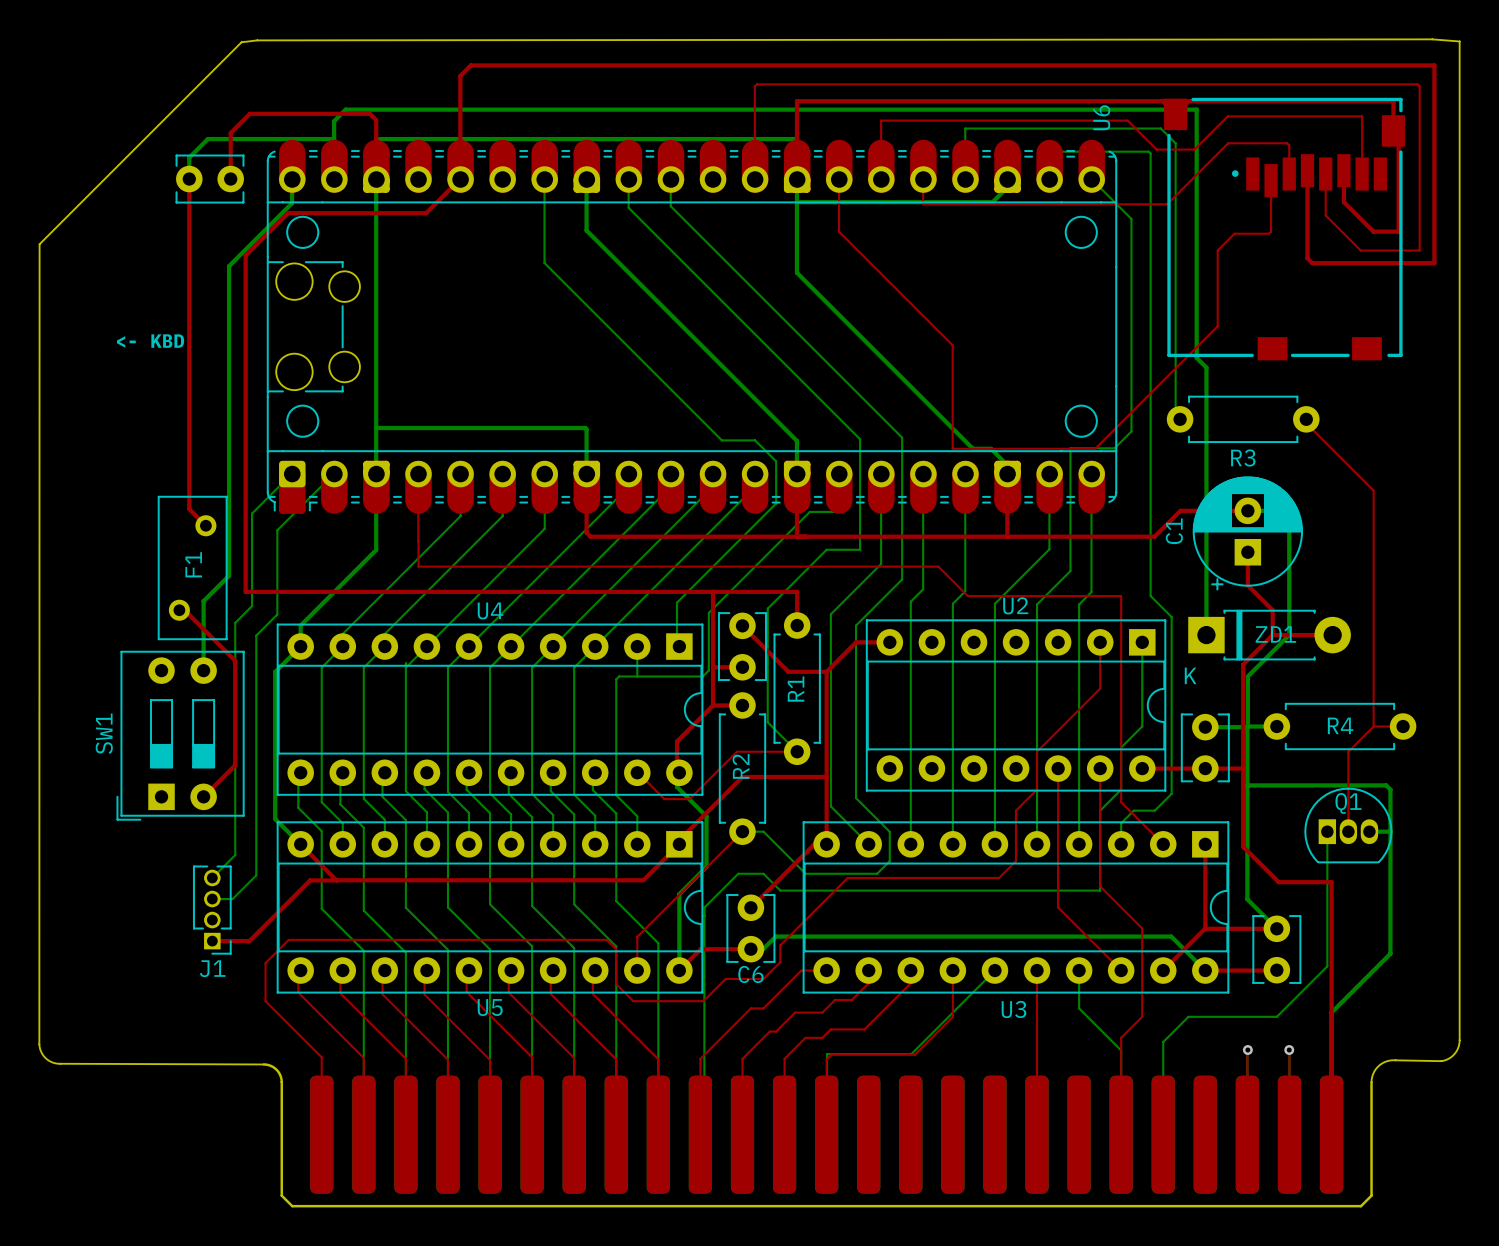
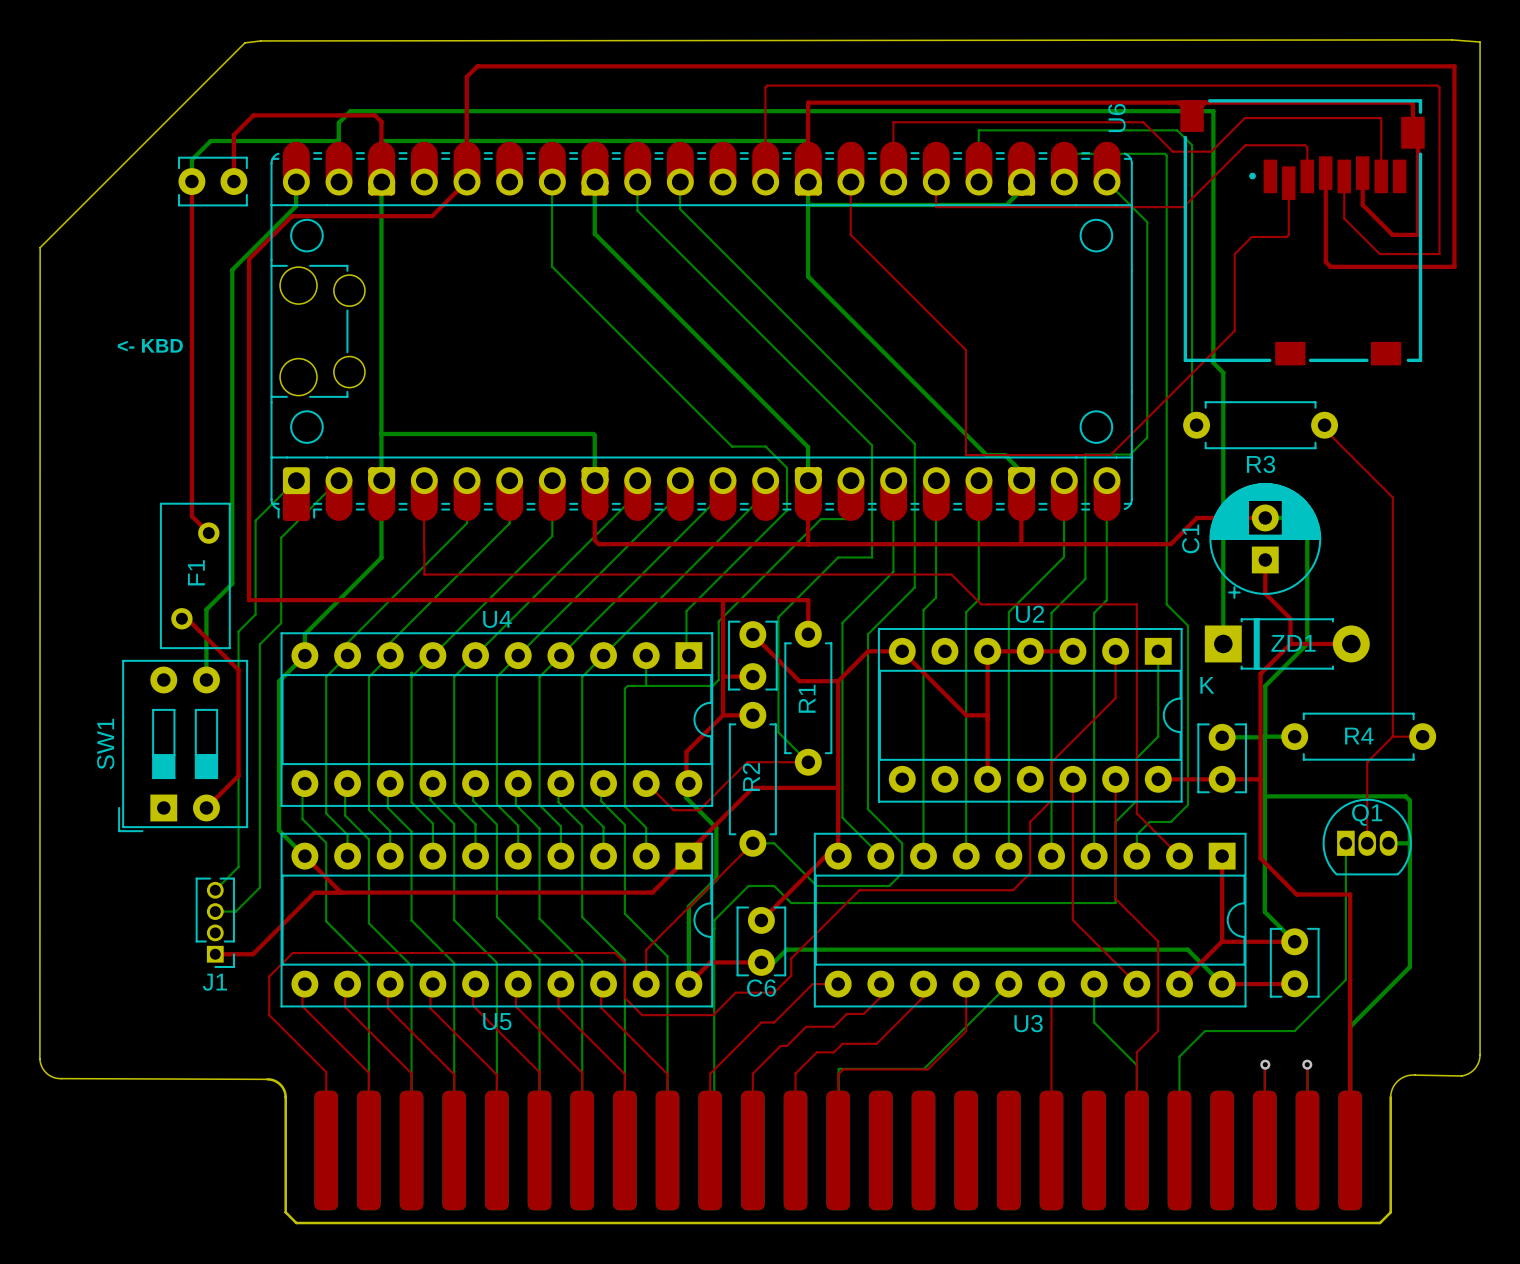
top track: none -> (902, 651) (966, 715) (987, 715)
top track: none -> (1072, 651) (987, 651) (987, 779)

